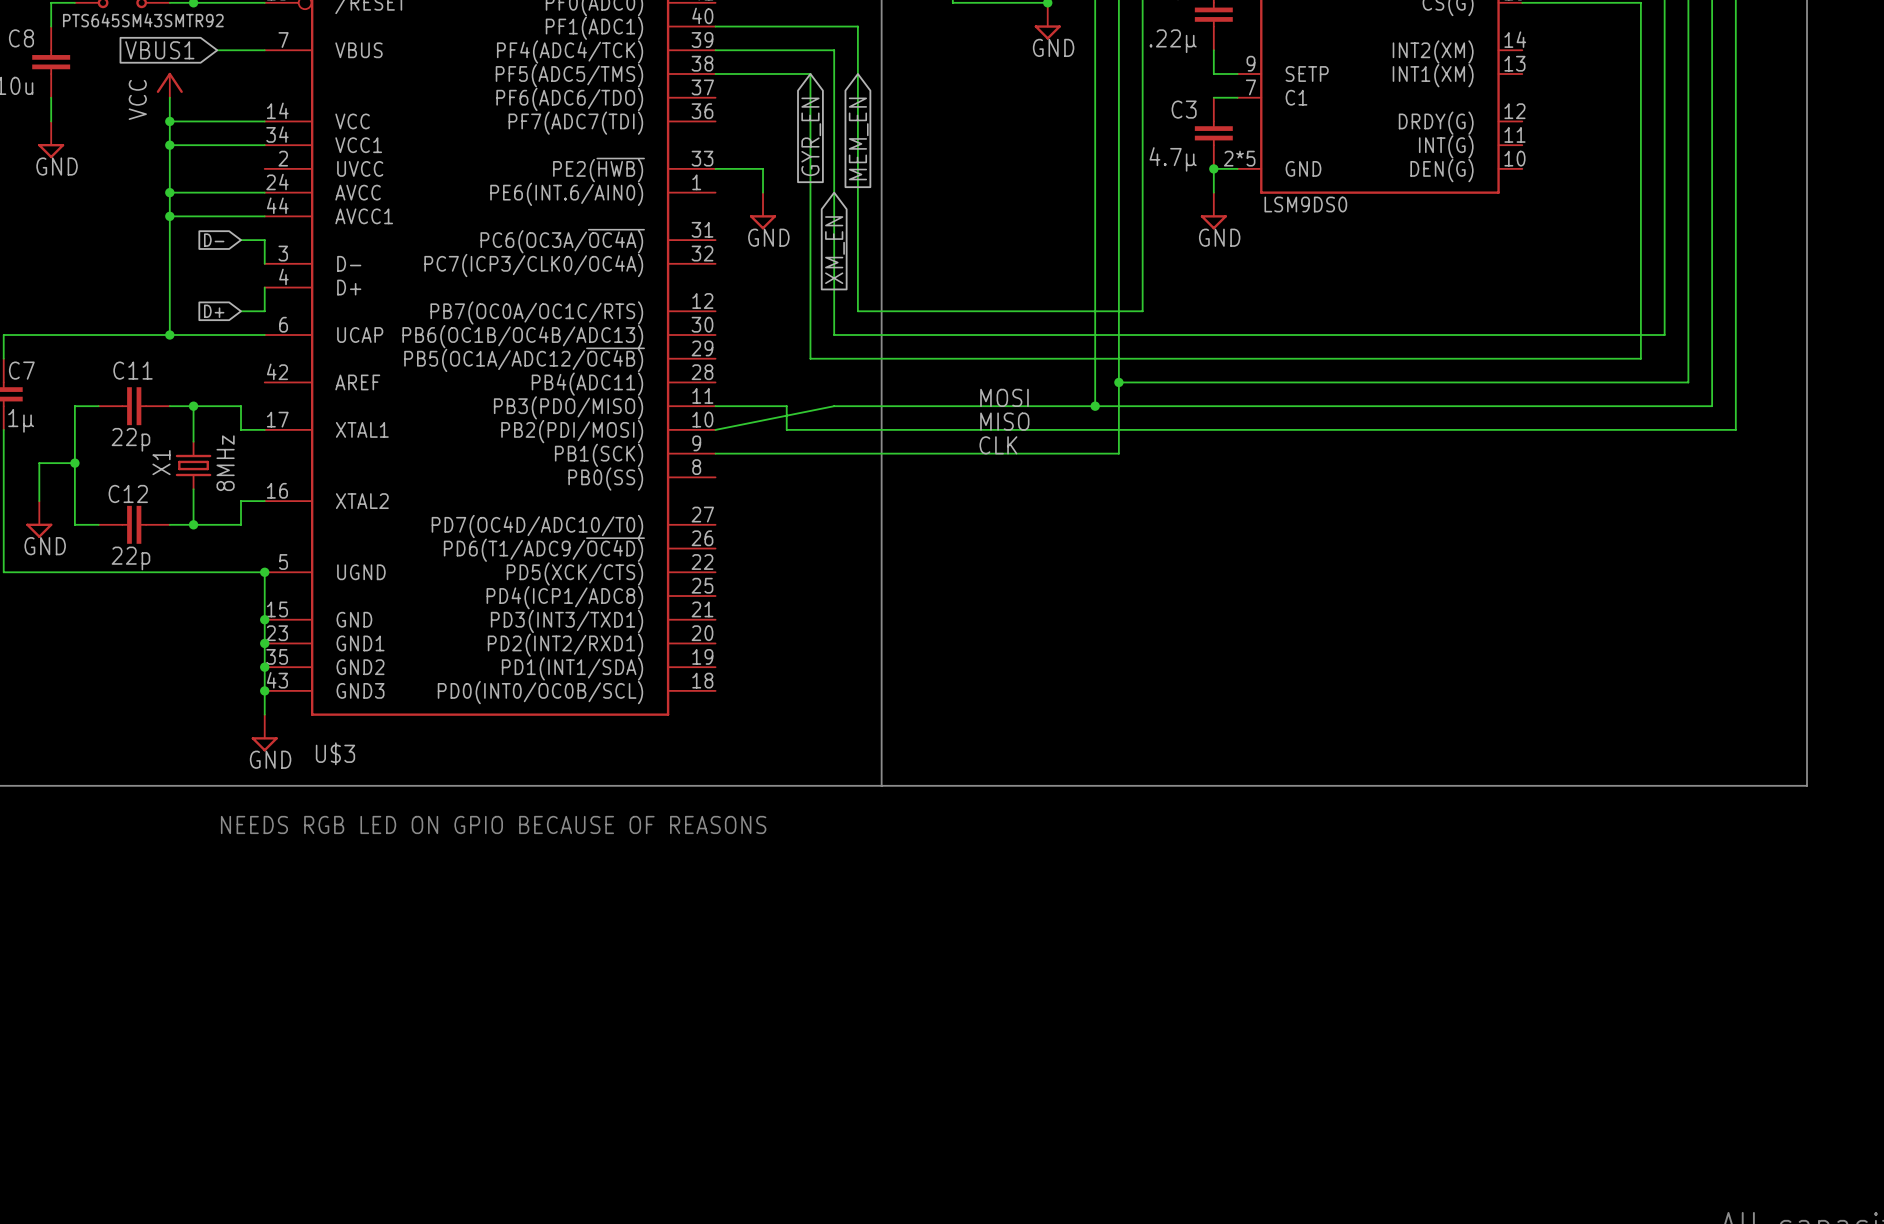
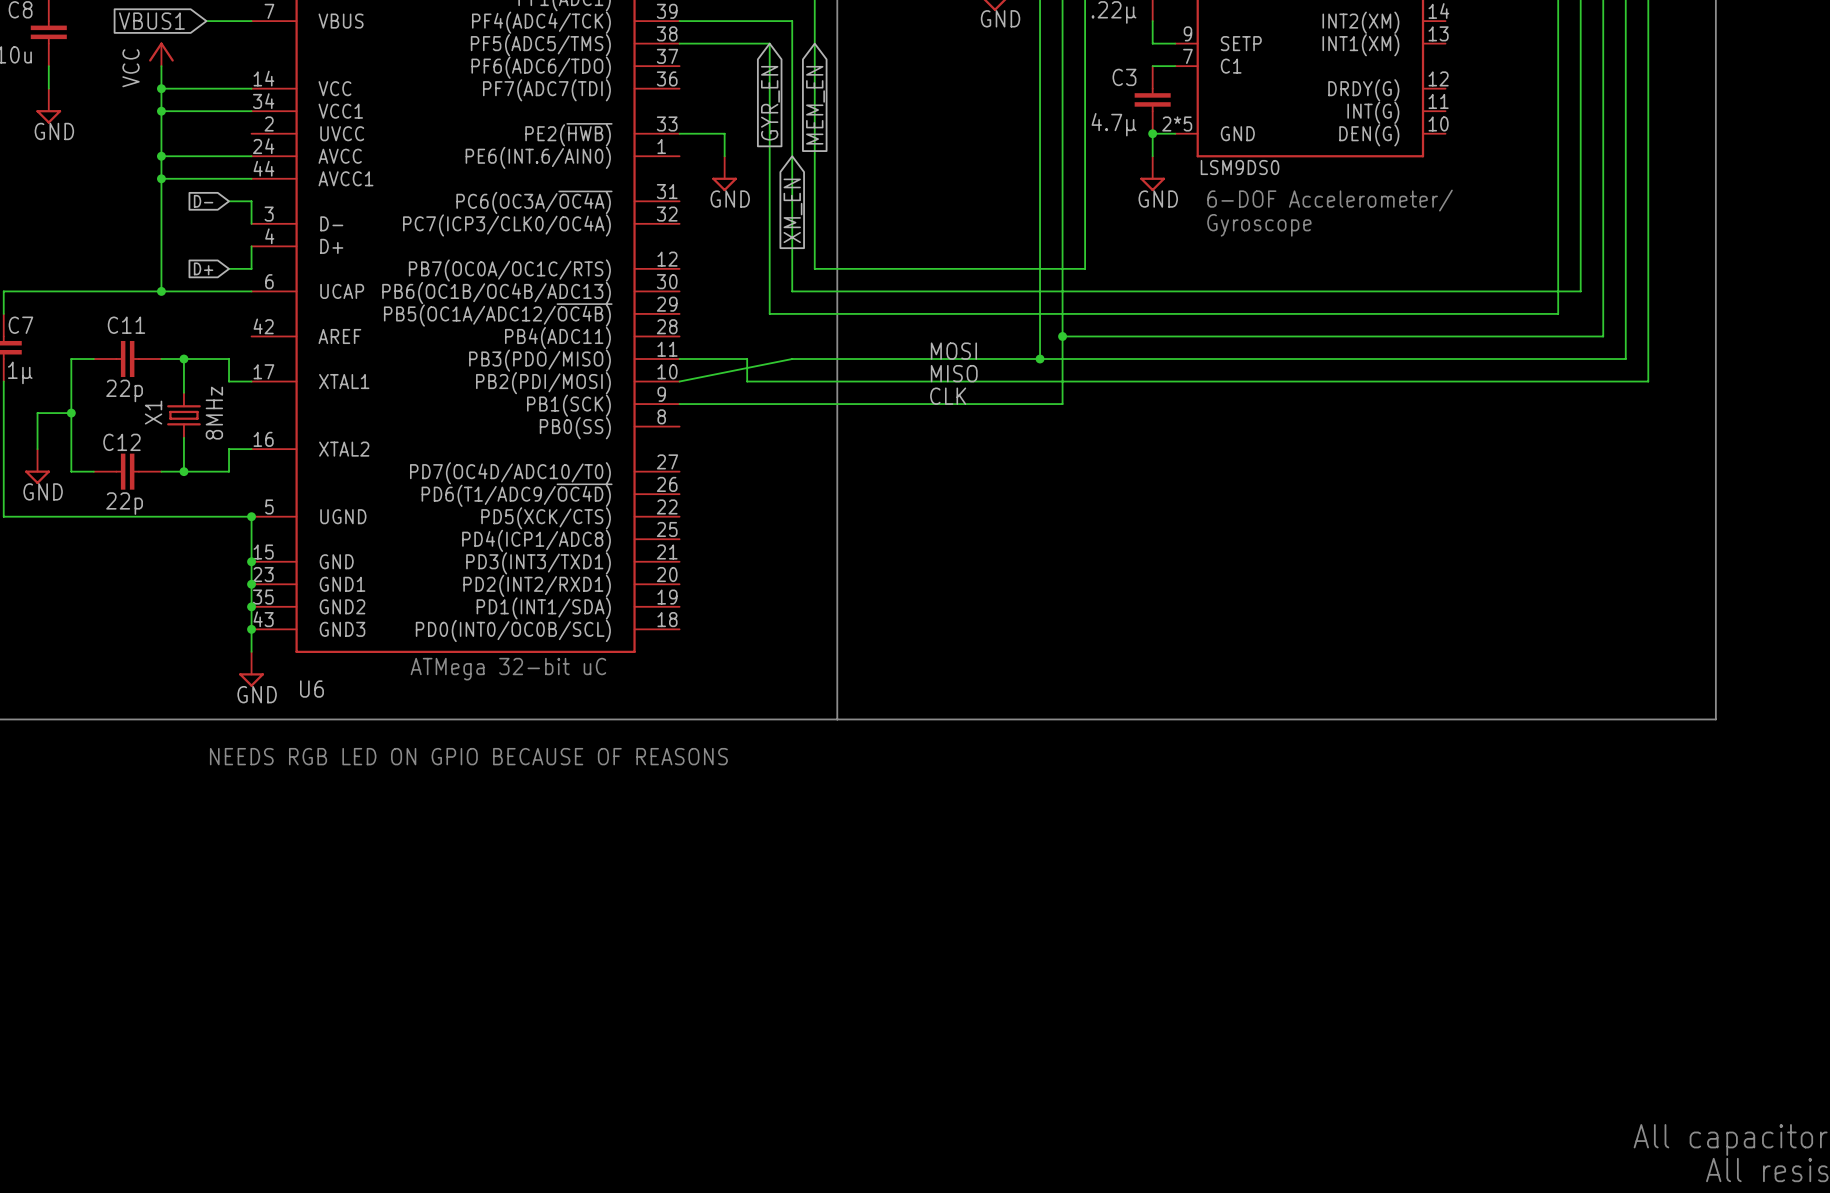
text: none -> 6-DOF Accelerometer/ (1330, 200)
text: none -> Gyroscope (1259, 225)
text: none -> ATMega 32-bit uC (508, 669)
U$3 name: U$3 (335, 753) -> U6 (311, 689)

